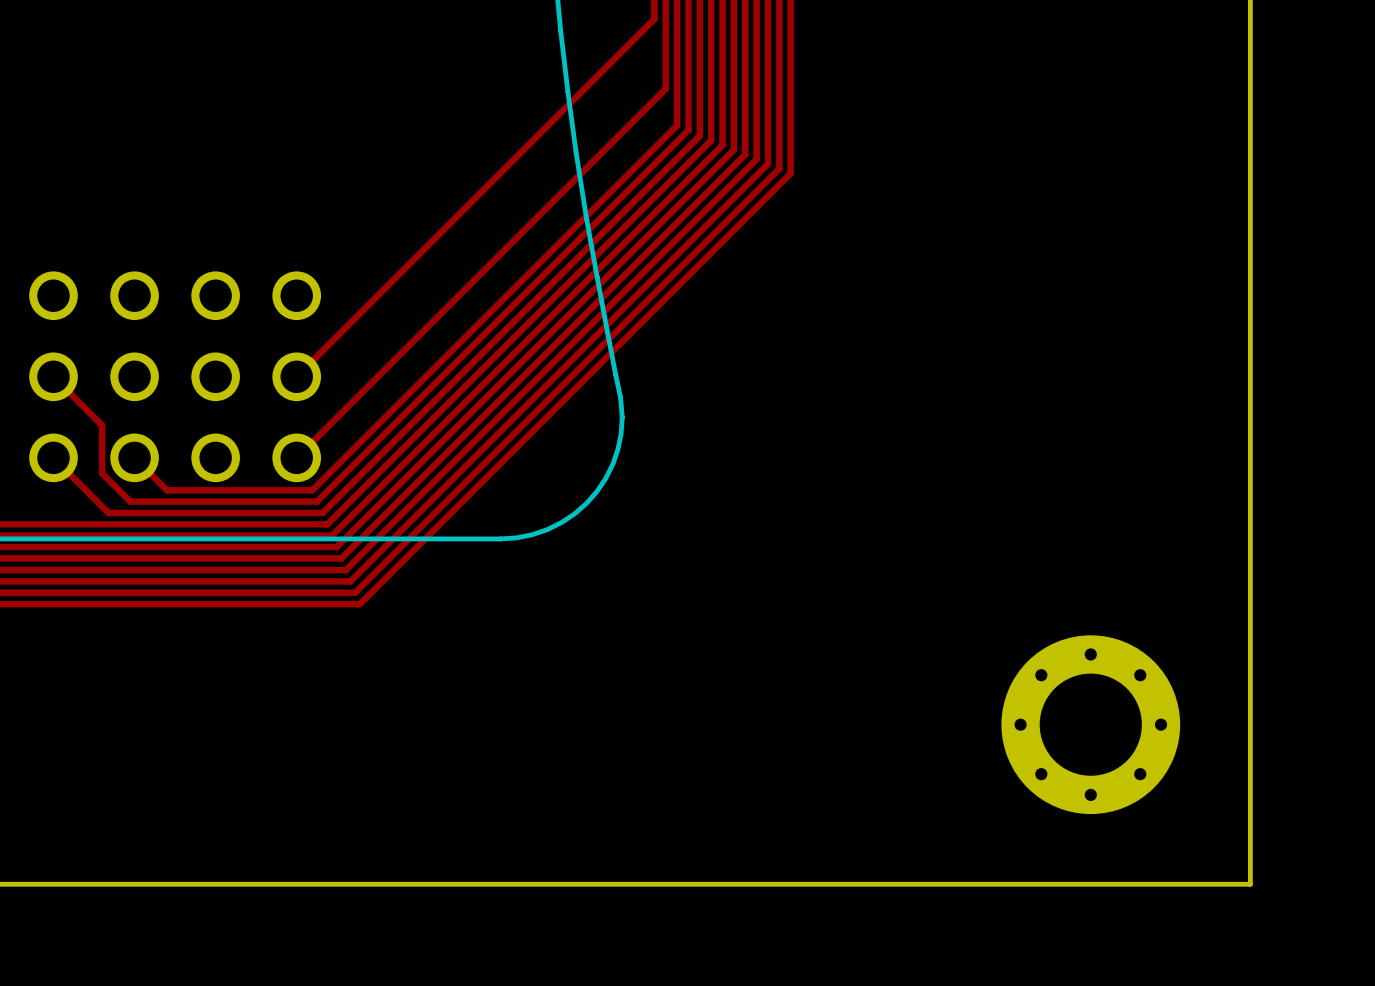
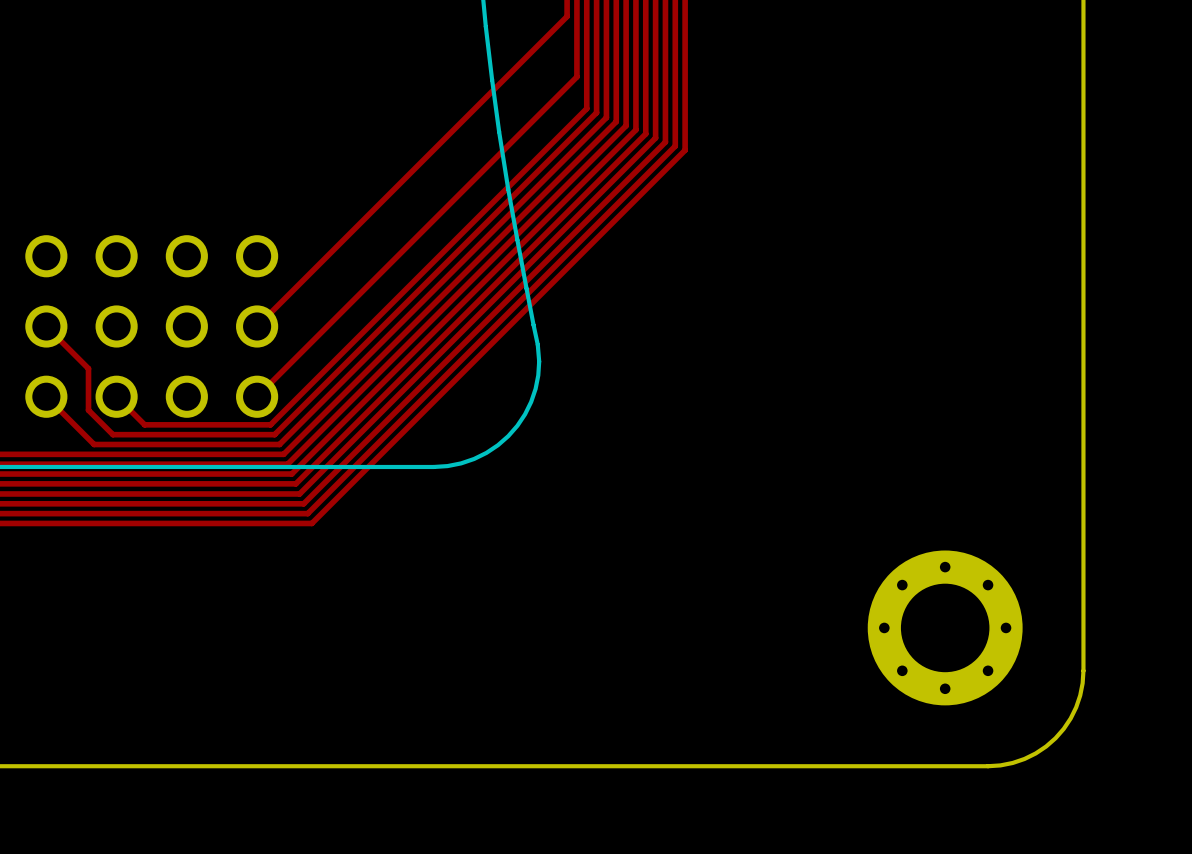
board edge: (1250, 774) (1250, 884) (1140, 884) -> (1083, 670) (1082, 683) (1076, 707) (1063, 728) (1055, 738) (1046, 746) (1024, 758) (1000, 765) (988, 766)

